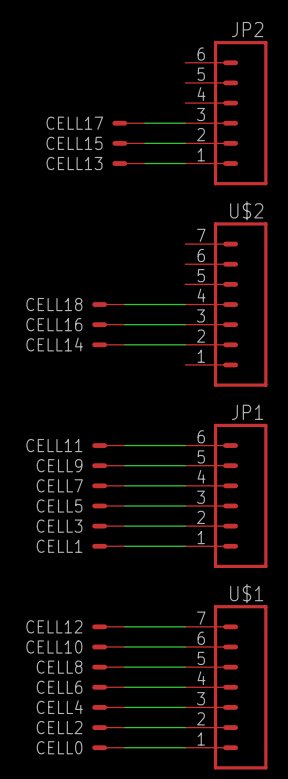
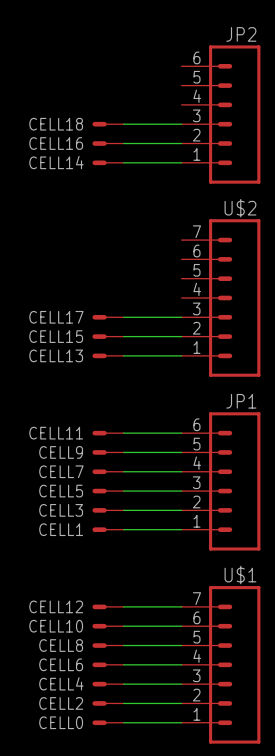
CELL17: (128, 123) -> none
CELL16: none -> (108, 143)
CELL15: (128, 143) -> none
CELL14: none -> (108, 162)
CELL13 position: (128, 163) -> (108, 355)
CELL18 position: (108, 304) -> (108, 124)
wire: (124, 304) (185, 304) -> (123, 355) (181, 355)
CELL16 name: CELL16 (54, 324) -> CELL17 (56, 317)
CELL14 name: CELL14 (54, 344) -> CELL15 (56, 336)

